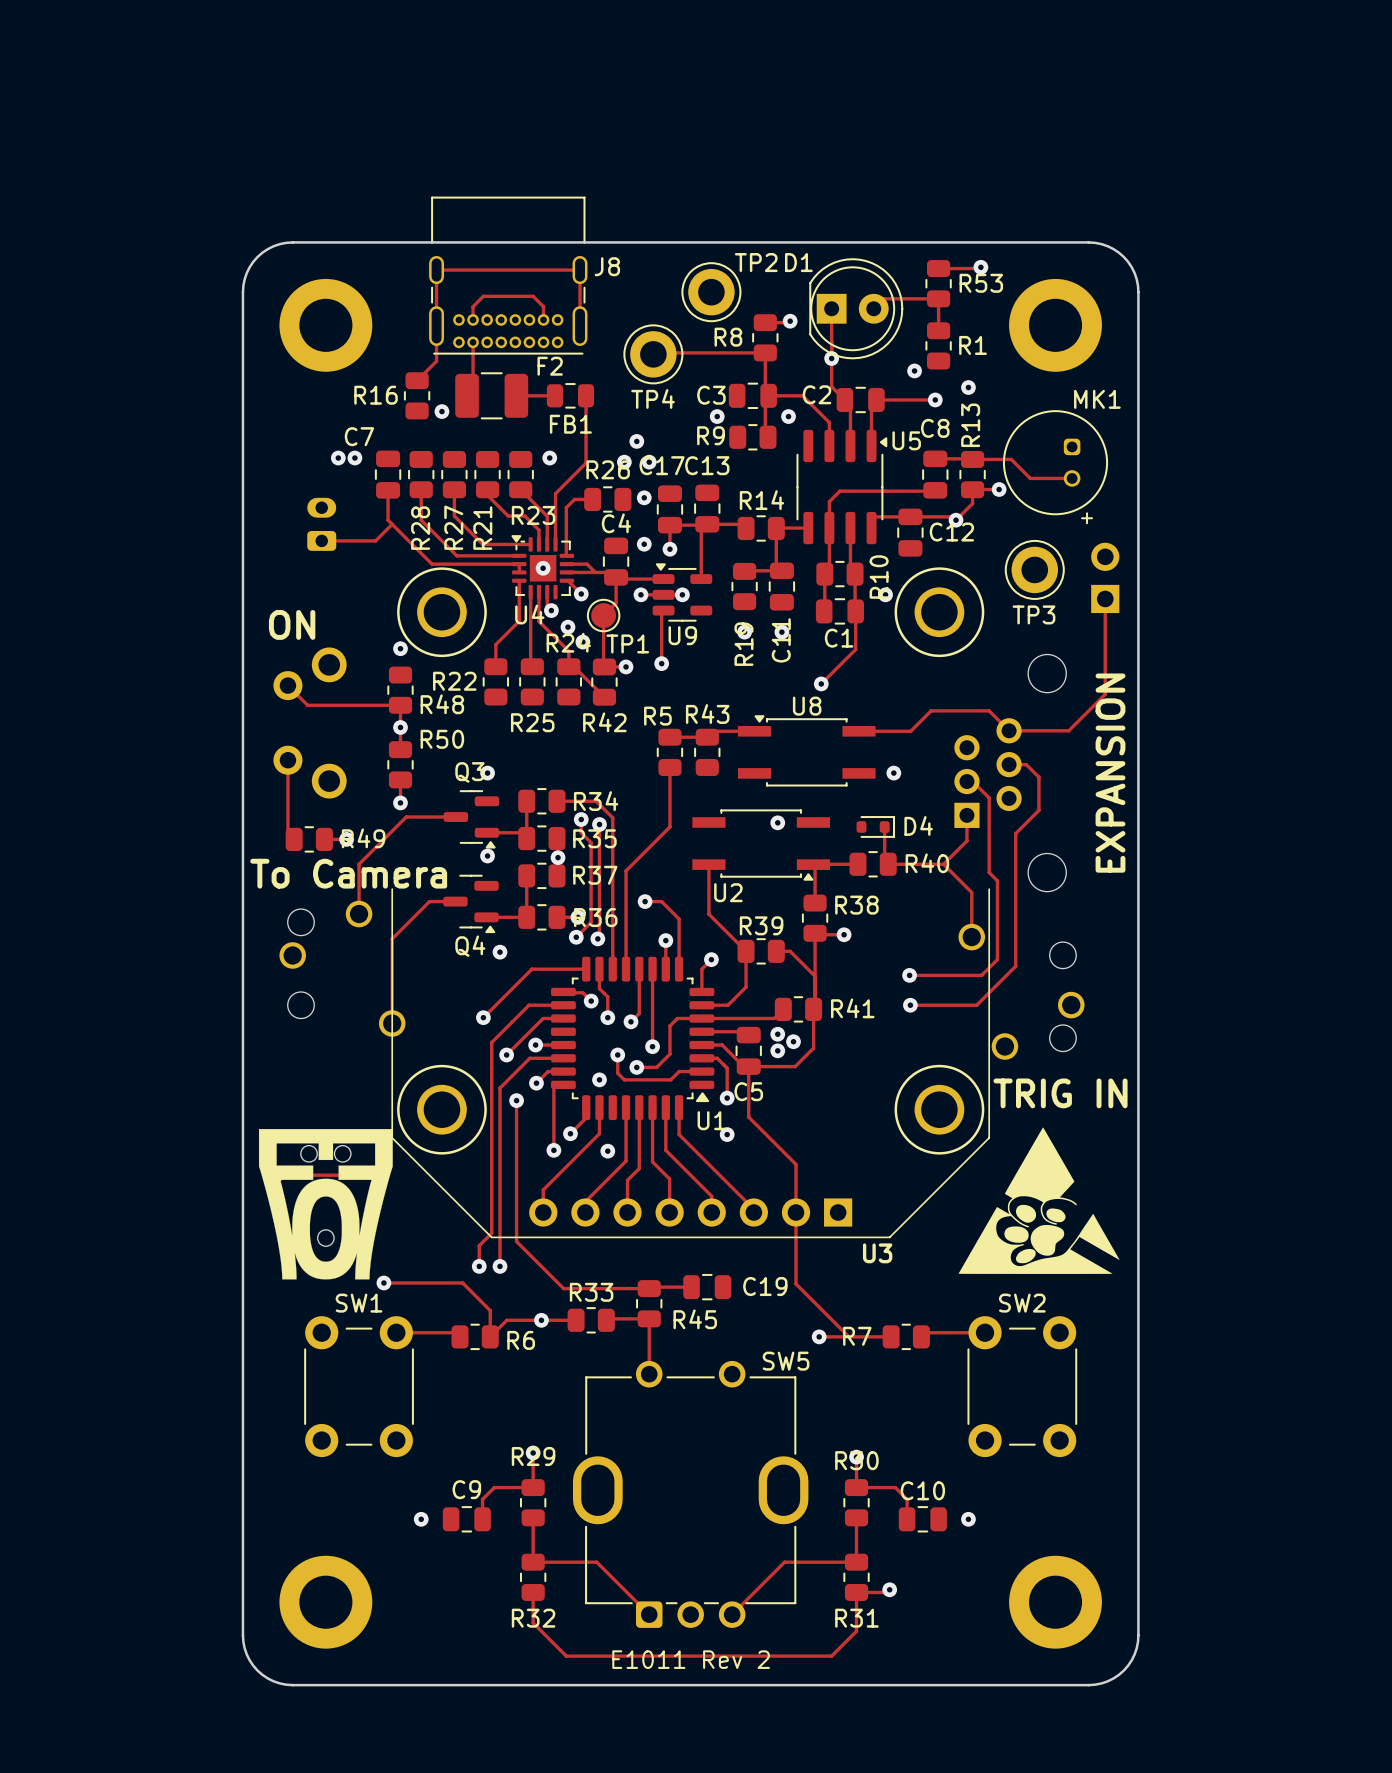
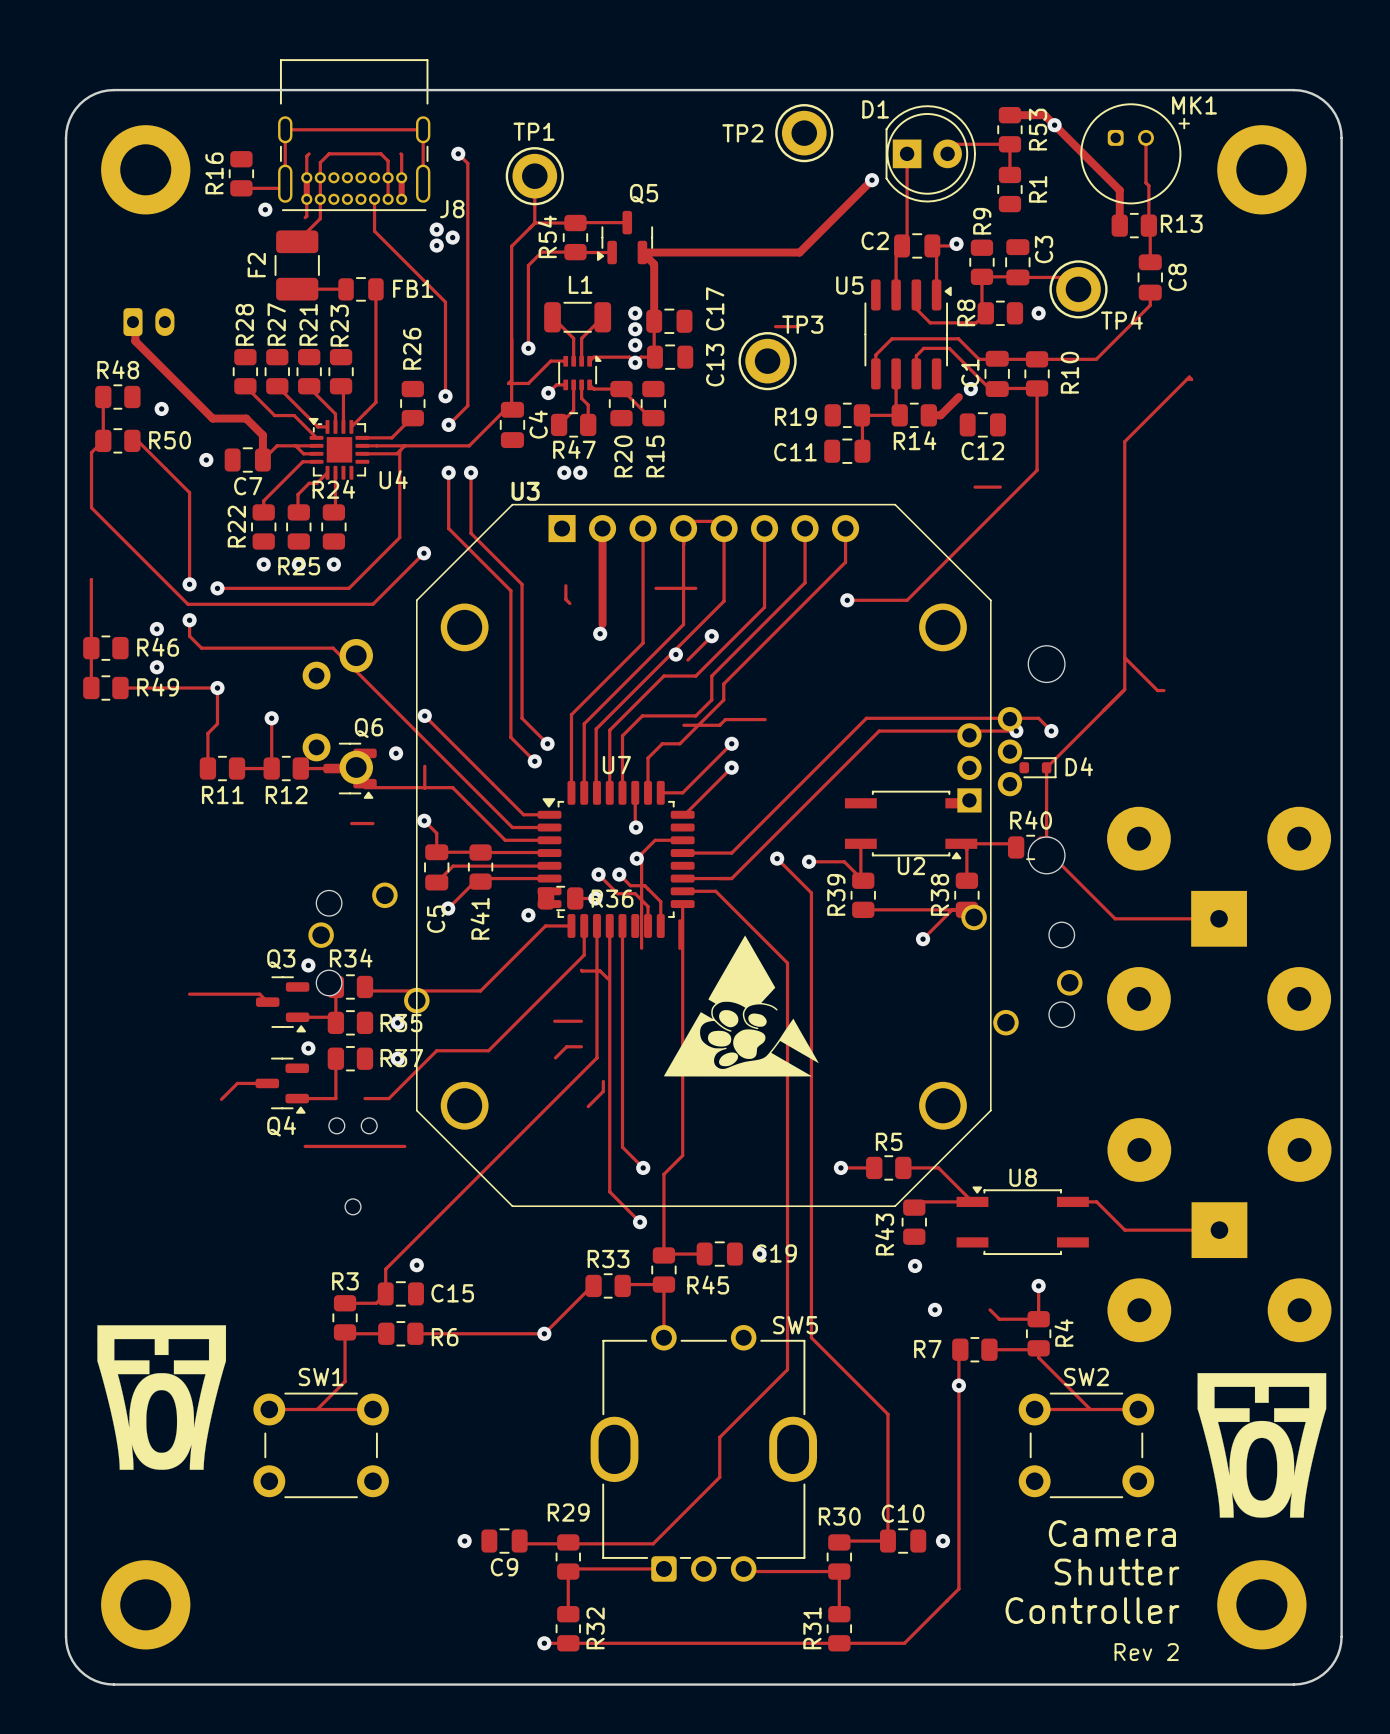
track: none -> (1009, 115) (1044, 115) (1119, 190) (1119, 225)
via: none -> (1054, 125)
track: none -> (1145, 137) (1145, 182) (1148, 185) (1150, 262)
track: none -> (309, 153) (306, 156) (306, 216) (305, 217)
track: none -> (400, 153) (401, 199)
track: none -> (458, 153) (467, 163) (467, 405) (448, 424)
via: none -> (458, 153)
track: none -> (907, 153) (907, 240) (896, 251) (896, 294)
track: none -> (534, 176) (534, 223)
track: none -> (872, 180) (799, 252) (642, 252) (654, 264) (654, 357) (640, 357) (635, 362) (629, 357) (593, 357) (589, 361)
via: none -> (872, 180)
track: none -> (423, 183) (423, 129) (285, 129) (285, 183) (280, 188) (241, 188)
track: none -> (374, 199) (374, 231) (445, 302) (445, 396)
track: none -> (388, 199) (388, 161) (380, 153) (329, 153) (320, 162) (320, 218) (297, 241)
via: none -> (265, 209)
track: none -> (627, 222) (534, 223) (511, 246) (511, 403) (469, 445) (362, 445)
via: none -> (436, 229)
via: none -> (452, 237)
R54: none -> (575, 237)
Q5: none -> (625, 237)
track: none -> (956, 243) (954, 245) (932, 245) (936, 250) (936, 294)
via: none -> (956, 243)
via: none -> (436, 245)
board edge: (292, 242) (1088, 242) (1101, 244) (1113, 249) (1123, 257) (1131, 267) (1136, 279) (1138, 292) (1138, 1635) (1136, 1648) (1131, 1660) (1123, 1670) (1113, 1678) (1101, 1683) (1088, 1685) (292, 1685) (279, 1683) (267, 1678) (257, 1670) (249, 1660) (244, 1648) (242, 1635) (242, 292) (246, 273) (257, 257) (273, 246) (292, 242) -> (113, 90) (95, 93) (80, 104) (69, 119) (66, 137) (66, 1636) (67, 1649) (75, 1665) (84, 1674) (95, 1680) (113, 1684) (1293, 1684) (1312, 1680) (1322, 1674) (1331, 1665) (1337, 1655) (1341, 1636) (1341, 137) (1337, 119) (1331, 108) (1322, 99) (1312, 93) (1293, 90) (113, 90)
track: none -> (612, 252) (541, 252) (528, 265) (528, 348)
TP2 footprint: [681, 262, 742, 323] -> [775, 104, 834, 163]
TP2 name position: TP2 (756, 262) -> TP2 (742, 133)
J8 name position: J8 (607, 266) -> J8 (452, 209)
track: (980, 267) (938, 268) -> none
via: (980, 267) -> none
J8 position: (508, 275) -> (354, 135)
track: none -> (297, 289) (345, 289)
track: none -> (375, 289) (375, 402) (351, 426)
R53 position: (938, 283) -> (1009, 129)
R53 name rotation: 0° (981, 283) -> 90° counterclockwise (1038, 129)
track: none -> (1078, 289) (1066, 277) (981, 276) (981, 309) (985, 313) (976, 322) (930, 322) (916, 309) (916, 294)
track: none -> (1150, 292) (1150, 305) (1096, 359) (979, 359) (958, 338) (891, 338) (875, 354) (875, 373)
via: none -> (635, 313)
track: (831, 308) (831, 386) (850, 405) (850, 445) -> none
D1 position: (856, 308) -> (930, 153)
track: (873, 308) (883, 298) (938, 298) (938, 330) -> (947, 153) (957, 144) (1009, 144) (1009, 174)
via: none -> (1038, 313)
track: none -> (552, 317) (573, 338) (573, 361)
L1: none -> (577, 317)
track: none -> (602, 317) (581, 338) (581, 361)
track: (473, 319) (473, 306) (483, 296) (533, 296) (543, 306) (543, 319) -> none
track: none -> (129, 325) (135, 320) (135, 341) (212, 418) (246, 418) (262, 435) (262, 459) (277, 445) (316, 445)
via: (790, 321) -> none
TP4 footprint: [623, 324, 684, 385] -> [1049, 260, 1108, 319]
part position: (325, 325) -> (145, 169)
via: none -> (635, 329)
part position: (1055, 325) -> (1261, 169)
track: (580, 326) (580, 270) (436, 270) (436, 361) (417, 380) -> none
R8 rotation: 0° (765, 337) -> 90° clockwise (1000, 313)
R8 position: (765, 337) -> (1000, 313)
via: none -> (635, 345)
track: (473, 342) (473, 389) (467, 395) -> none
via: none -> (528, 348)
R1 position: (938, 345) -> (1009, 189)
R1 name rotation: 0° (972, 345) -> 90° counterclockwise (1038, 189)
track: (653, 354) (765, 352) (765, 434) (768, 437) -> none
track: none -> (565, 361) (550, 361) (528, 383) (508, 383) (511, 380)
via: (831, 358) -> none
via: none -> (635, 362)
F2 name position: F2 (550, 366) -> F2 (256, 265)
part: none -> (579, 372)
via: (914, 370) -> none
track: none -> (896, 373) (896, 411) (899, 415) (861, 415) (862, 451)
track: none -> (916, 373) (916, 355) (923, 348) (949, 348) (990, 389) (1037, 388) (1037, 470) (907, 600) (847, 600)
track: none -> (1187, 379) (1191, 379) (1189, 377) (1124, 441) (1124, 689) (1046, 767) (1045, 848) (1115, 918) (1219, 918)
track: none -> (565, 384) (556, 384) (548, 393)
track: none -> (573, 384) (573, 410) (559, 424)
track: none -> (581, 384) (581, 398) (588, 404) (588, 424)
track: none -> (589, 384) (593, 389) (621, 389) (650, 418)
track: none -> (245, 386) (274, 415) (294, 415) (316, 437)
track: none -> (277, 386) (317, 426) (327, 426)
track: none -> (309, 386) (335, 413) (335, 426)
track: none -> (341, 386) (343, 388) (343, 426)
via: none -> (548, 393)
via: none -> (445, 396)
track: none -> (103, 397) (103, 440) (91, 452) (91, 507) (187, 604) (372, 604) (423, 553)
R16 name rotation: 0° (376, 395) -> 90° counterclockwise (214, 173)
R16 position: (417, 395) -> (241, 173)
F2 rotation: 0° (491, 395) -> 90° clockwise (297, 265)
F2 position: (491, 395) -> (297, 265)
track: (516, 395) (554, 395) -> none
FB1 position: (570, 395) -> (360, 289)
track: (586, 395) (586, 463) (555, 493) (555, 544) -> none
C3 name position: C3 (711, 395) -> C3 (1044, 249)
C3 rotation: 0° (752, 395) -> 90° clockwise (1017, 262)
C3 position: (752, 395) -> (1017, 262)
track: (768, 395) (802, 395) (829, 422) (829, 445) -> none
track: none -> (958, 397) (940, 415) (928, 415)
TP4 name position: TP4 (652, 398) -> TP4 (1121, 320)
C2 position: (860, 399) -> (917, 245)
track: (935, 399) (876, 399) (871, 404) (871, 445) -> none
via: (935, 399) -> none
R20: none -> (621, 403)
R15: none -> (653, 403)
via: none -> (161, 408)
via: (441, 411) -> none
via: (717, 416) -> none
via: (788, 416) -> none
track: none -> (410, 419) (391, 437) (362, 437)
via: none -> (448, 424)
R47: none -> (573, 424)
FB1 name position: FB1 (570, 424) -> FB1 (413, 288)
C8 name rotation: 0° (935, 428) -> 90° counterclockwise (1177, 277)
C8 name position: C8 (935, 428) -> C8 (1177, 277)
C7 name position: C7 (359, 436) -> C7 (248, 486)
R9 rotation: 0° (752, 437) -> 90° clockwise (981, 262)
R9 position: (752, 437) -> (981, 262)
U5 name position: U5 (906, 440) -> U5 (849, 285)
track: none -> (132, 440) (137, 440) (189, 492) (189, 584)
via: (636, 441) -> none
track: none -> (295, 445) (303, 453) (316, 453)
track: none -> (404, 445) (396, 453) (362, 453)
track: none -> (399, 450) (399, 537) (349, 588) (217, 588)
via: (338, 458) -> none
via: (354, 458) -> none
via: (549, 458) -> none
track: (935, 458) (1011, 459) (1030, 478) (1072, 478) -> none
via: none -> (206, 459)
via: (624, 462) -> none
via: (649, 462) -> none
track: none -> (316, 461) (302, 461) (263, 500) (263, 512)
MK1 rotation: 0° (1055, 467) -> 90° counterclockwise (1135, 153)
MK1 position: (1055, 467) -> (1135, 153)
track: none -> (327, 472) (316, 483) (309, 483) (298, 494) (298, 513)
track: none -> (335, 472) (335, 511) (333, 513)
C7 rotation: 0° (388, 474) -> 90° clockwise (247, 459)
C7 position: (388, 474) -> (247, 459)
R28 position: (421, 474) -> (245, 371)
track: none -> (448, 472) (448, 528) (510, 590) (510, 737) (534, 761)
via: none -> (448, 472)
track: none -> (471, 472) (471, 533) (522, 584) (522, 718) (547, 743)
via: none -> (471, 472)
R27 position: (454, 474) -> (277, 371)
R21 position: (487, 474) -> (309, 371)
R23 position: (520, 474) -> (341, 371)
via: none -> (564, 472)
via: none -> (580, 472)
C8 position: (935, 474) -> (1150, 277)
R13 rotation: 0° (972, 474) -> 90° clockwise (1134, 225)
R13 position: (972, 474) -> (1134, 225)
U5 position: (841, 487) -> (908, 334)
track: (454, 489) (454, 516) (482, 544) (530, 544) -> none
track: (487, 489) (487, 495) (508, 516) (524, 516) (538, 530) (538, 544) -> none
track: (972, 489) (972, 503) (959, 516) (873, 516) -> none
via: (999, 489) -> none
track: (388, 490) (388, 520) (432, 564) (519, 564) (519, 572) -> none
track: (935, 490) (839, 491) (829, 501) (829, 569) (824, 574) (824, 611) -> none
track: (421, 491) (421, 520) (456, 555) (519, 555) -> none
track: (520, 491) (547, 516) (547, 544) -> none
via: (644, 497) -> none
track: (592, 499) (574, 499) (566, 507) (566, 555) -> none
R26 rotation: 0° (607, 499) -> 90° clockwise (412, 403)
R26 position: (607, 499) -> (412, 403)
R14 name position: R14 (761, 500) -> R14 (915, 440)
C13 rotation: 0° (707, 508) -> 90° clockwise (670, 357)
C13 position: (707, 508) -> (670, 357)
C17 rotation: 0° (669, 509) -> 90° clockwise (669, 321)
C17 position: (669, 509) -> (669, 321)
R23 name rotation: 0° (533, 515) -> 90° counterclockwise (339, 325)
R23 name position: R23 (533, 515) -> R23 (339, 325)
via: (956, 520) -> none
C4 name rotation: 0° (616, 523) -> 90° counterclockwise (538, 424)
C4 name position: C4 (616, 523) -> C4 (538, 424)
part rotation: 0° (321, 524) -> 90° clockwise (148, 322)
part position: (321, 524) -> (148, 322)
track: (392, 524) (375, 540) (321, 540) -> none
R27 name position: R27 (453, 527) -> R27 (276, 324)
R28 name position: R28 (420, 528) -> R28 (244, 324)
R21 name position: R21 (482, 528) -> R21 (308, 324)
track: (746, 528) (741, 524) (707, 524) (701, 530) (701, 579) -> none
R14 position: (761, 528) -> (914, 415)
track: (808, 528) (776, 528) (776, 565) (781, 570) (744, 571) -> none
track: (850, 528) (850, 569) (855, 574) (855, 649) (821, 683) -> none
track: none -> (602, 528) (602, 629)
track: none -> (643, 528) (643, 643) (571, 714) (571, 792)
track: none -> (683, 528) (683, 624) (584, 723) (584, 792)
track: none -> (724, 528) (724, 601) (596, 729) (596, 792)
track: none -> (764, 528) (764, 607) (695, 676) (663, 676) (609, 730) (609, 792)
track: none -> (805, 528) (805, 582) (711, 676) (711, 699) (695, 715) (642, 715) (622, 735) (622, 792)
track: none -> (845, 528) (845, 562) (723, 684) (723, 699) (679, 743) (662, 743) (648, 758) (648, 792)
C12 rotation: 0° (910, 532) -> 90° clockwise (982, 424)
C12 position: (910, 532) -> (982, 424)
TP3 footprint: [1004, 539, 1065, 600] -> [738, 332, 797, 391]
via: (644, 544) -> none
via: (669, 549) -> none
via: none -> (423, 553)
C4 position: (616, 561) -> (512, 424)
track: (566, 564) (587, 564) (595, 572) -> none
drawing: [397, 567, 487, 658] -> none
U4 position: (542, 567) -> (339, 448)
drawing: [894, 567, 985, 658] -> none
via: (543, 568) -> none
via: none -> (263, 564)
via: none -> (298, 564)
via: none -> (333, 564)
track: (566, 572) (611, 572) (617, 579) (663, 579) -> none
R10 rotation: 0° (839, 574) -> 90° clockwise (1037, 373)
R10 position: (839, 574) -> (1037, 373)
track: (616, 577) (616, 603) (603, 615) (603, 666) (626, 666) -> none
part: (1105, 577) -> none
track: (519, 580) (519, 621) (495, 644) (495, 666) -> none
track: (566, 580) (581, 593) -> none
track: none -> (91, 579) (91, 688)
R19 rotation: 0° (744, 586) -> 90° clockwise (847, 415)
R19 position: (744, 586) -> (847, 415)
C11 rotation: 0° (781, 586) -> 90° clockwise (847, 451)
C11 position: (781, 586) -> (847, 451)
U3 footprint: [391, 587, 991, 1239] -> [416, 503, 992, 1208]
via: none -> (189, 584)
track: (530, 592) (530, 665) (532, 666) -> none
track: (538, 592) (538, 621) (568, 651) (568, 666) (573, 666) (604, 697) -> none
U9: (682, 592) -> none
via: (581, 593) -> none
via: none -> (217, 588)
via: (640, 594) -> none
via: (682, 594) -> none
via: (885, 594) -> none
TP1 footprint: [586, 598, 621, 633] -> [505, 147, 564, 206]
track: (1105, 598) (1105, 694) (1068, 730) (1009, 730) (989, 710) (931, 710) (910, 731) (859, 731) -> none
via: none -> (847, 600)
via: (551, 610) -> none
track: (663, 610) (661, 612) (661, 663) -> none
C1 rotation: 0° (839, 611) -> 90° clockwise (997, 373)
C1 position: (839, 611) -> (997, 373)
U4 name position: U4 (529, 614) -> U4 (393, 479)
TP3 name position: TP3 (1033, 614) -> TP3 (802, 324)
text: ON (292, 624) -> none
track: none -> (189, 620) (189, 636) (201, 648) (333, 648) (512, 827) (549, 827)
via: none -> (189, 620)
via: (567, 627) -> none
via: (744, 632) -> none
via: (781, 632) -> none
via: none -> (156, 629)
TP1 name position: TP1 (627, 643) -> TP1 (534, 131)
track: none -> (711, 636) (687, 660)
via: none -> (711, 636)
via: (400, 648) -> none
R46: none -> (105, 648)
via: (626, 666) -> none
track: none -> (1124, 657) (1157, 690) (1163, 690)
via: none -> (156, 667)
R22 name rotation: 0° (454, 681) -> 90° counterclockwise (236, 526)
R22 position: (495, 681) -> (263, 526)
R25 position: (532, 681) -> (298, 526)
R24 position: (568, 681) -> (333, 526)
R42: (604, 682) -> none
via: (821, 683) -> none
track: (287, 685) (307, 705) (400, 705) (400, 749) -> none
R48 rotation: 0° (400, 690) -> 90° clockwise (117, 397)
R48 position: (400, 690) -> (117, 397)
track: none -> (120, 688) (217, 688) (217, 723) (207, 733) (207, 768)
via: none -> (217, 688)
R48 name position: R48 (442, 704) -> R48 (118, 369)
R43 name rotation: 0° (707, 714) -> 90° counterclockwise (884, 1234)
R43 name position: R43 (707, 714) -> R43 (884, 1234)
track: none -> (424, 715) (523, 814) (549, 814)
track: none -> (271, 718) (271, 768) (237, 768)
via: none -> (271, 718)
track: none -> (1016, 731) (879, 731) (731, 878) (682, 878)
via: none -> (1016, 731)
track: none -> (1051, 731) (1038, 718) (866, 718) (731, 853) (682, 853)
via: none -> (1051, 731)
U8 position: (806, 750) -> (1022, 1220)
R5 rotation: 0° (669, 752) -> 90° clockwise (888, 1167)
R5 position: (669, 752) -> (888, 1167)
R43 position: (707, 752) -> (914, 1222)
via: none -> (547, 743)
track: none -> (731, 743) (682, 792) (660, 792)
via: none -> (731, 743)
track: (287, 760) (287, 833) (294, 839) -> none
R50 rotation: 0° (400, 764) -> 90° clockwise (117, 440)
R50 position: (400, 764) -> (117, 440)
track: (1009, 764) (1026, 764) (1038, 777) (1038, 810) (1015, 833) (1015, 966) (976, 1005) (910, 1005) -> none
via: none -> (396, 753)
track: (669, 767) (669, 826) (640, 856) -> (682, 840) (655, 840)
via: (487, 773) -> none
via: (893, 773) -> none
text: EXPANSION (1110, 773) -> none
via: none -> (534, 761)
track: none -> (731, 767) (682, 814)
via: none -> (731, 767)
track: (966, 781) (972, 781) (989, 797) (989, 872) (997, 880) (997, 959) (981, 975) (909, 975) -> none
R11: none -> (222, 768)
R12: none -> (286, 768)
track: none -> (300, 768) (335, 768)
Q6: none -> (350, 770)
track: (526, 801) (526, 838) (520, 832) (486, 832) -> (335, 986) (335, 1022) (330, 1017) (297, 1017)
R34 position: (541, 801) -> (350, 986)
track: (557, 801) (596, 801) (612, 817) (612, 969) -> none
R34 name position: R34 (596, 801) -> R34 (351, 958)
track: none -> (364, 787) (452, 787) (505, 840) (549, 840)
via: (400, 802) -> none
track: none -> (635, 792) (636, 827)
track: (966, 815) (966, 840) (943, 864) -> none
track: (455, 817) (406, 817) (359, 864) (359, 914) -> none
Q3 position: (471, 819) -> (282, 1004)
track: (581, 819) (581, 832) (591, 842) (591, 922) (576, 937) -> none
via: (581, 819) -> none
via: (777, 822) -> none
track: (599, 824) (599, 937) (597, 938) -> none
via: (599, 824) -> none
D4 position: (875, 826) -> (1038, 767)
track: (884, 826) (884, 860) (888, 864) (943, 864) -> none
track: none -> (424, 820) (436, 833) (436, 852) (549, 853)
via: none -> (424, 820)
R35 position: (541, 838) -> (350, 1022)
R49 position: (309, 839) -> (105, 688)
via: (346, 839) -> none
via: none -> (636, 827)
U2 position: (761, 845) -> (911, 824)
via: (487, 855) -> none
via: (558, 857) -> none
track: none -> (860, 843) (860, 878)
R40 name position: R40 (927, 863) -> R40 (1031, 820)
track: (708, 864) (708, 914) (746, 951) (746, 987) (728, 1005) (701, 1005) -> none
track: (857, 864) (813, 864) (815, 903) -> none
R40 position: (873, 864) -> (1030, 847)
track: (943, 864) (971, 892) (971, 937) -> none
track: none -> (1016, 847) (1012, 843) (961, 843) (966, 849) (966, 880)
text: To Camera (348, 873) -> none
track: (526, 875) (526, 917) (486, 917) -> (335, 1058) (335, 1098) (297, 1098)
R37 position: (541, 875) -> (350, 1058)
via: none -> (636, 858)
track: none -> (777, 858) (811, 892) (811, 1337) (887, 1414) (887, 1541) (839, 1542)
via: none -> (777, 858)
U7: none -> (616, 859)
track: none -> (809, 861) (844, 861) (863, 880)
via: none -> (809, 861)
track: none -> (549, 865) (453, 866) (436, 882)
track: none -> (598, 874) (617, 893) (635, 893) (648, 906) (648, 925)
via: none -> (598, 874)
track: none -> (619, 874) (630, 885) (644, 885) (660, 901) (660, 925)
via: none -> (619, 874)
U2 name position: U2 (728, 892) -> U2 (911, 865)
track: none -> (549, 878) (483, 878) (480, 881) (475, 881) (448, 908)
track: (455, 901) (429, 901) (392, 938) (392, 1023) -> none
track: (645, 901) (661, 901) (679, 919) (679, 969) -> none
via: (645, 901) -> none
Q4 position: (470, 903) -> (282, 1085)
R38 name rotation: 0° (856, 905) -> 90° counterclockwise (939, 894)
R38 name position: R38 (856, 905) -> R38 (939, 894)
track: none -> (682, 891) (715, 891) (787, 963) (787, 1369) (719, 1437) (719, 1477) (653, 1543) (522, 1543) (519, 1541)
R38 position: (815, 918) -> (966, 895)
R39 name position: R39 (761, 925) -> R39 (836, 894)
via: none -> (448, 908)
track: none -> (863, 909) (966, 909)
track: none -> (952, 909) (923, 939)
track: (844, 934) (815, 933) (813, 1048) (795, 1066) (743, 1066) (722, 1045) (701, 1045) -> none
via: (844, 934) -> none
via: (576, 937) -> none
via: (597, 938) -> none
part: none -> (1219, 918)
via: (665, 940) -> none
track: none -> (571, 925) (545, 925) (480, 990) (368, 990) (364, 986)
track: none -> (584, 925) (584, 955) (488, 1050) (436, 1050) (388, 1098) (364, 1098)
track: none -> (596, 925) (596, 1057) (385, 1269) (385, 1293) (376, 1303) (345, 1303)
track: none -> (609, 925) (609, 1191) (640, 1222)
track: none -> (622, 925) (622, 1147) (643, 1167)
R39 rotation: 0° (761, 951) -> 90° clockwise (863, 895)
R39 position: (761, 951) -> (863, 895)
track: (776, 951) (790, 951) (815, 976) -> none
via position: (499, 952) -> (528, 915)
track: (711, 959) (701, 969) (701, 991) -> none
via: (711, 959) -> none
track: (586, 969) (531, 969) (483, 1017) -> none
track: (599, 969) (599, 988) (607, 996) (607, 1017) -> none
track: (639, 969) (639, 1013) (631, 1021) -> none
track: (652, 969) (652, 1046) -> none
via position: (909, 975) -> (923, 939)
via: none -> (308, 965)
via: (591, 1001) -> none
track: (563, 1005) (529, 1005) (491, 1042) (491, 1233) (479, 1245) (479, 1266) -> none
via: (910, 1005) -> none
track: (783, 1009) (774, 1018) (677, 1018) (669, 1025) (669, 1054) (656, 1067) (636, 1067) -> none
R41 rotation: 0° (798, 1009) -> 90° clockwise (480, 867)
R41 position: (798, 1009) -> (480, 867)
track: none -> (189, 994) (259, 994) (267, 1002)
via: (483, 1017) -> none
via: (607, 1017) -> none
track: (563, 1018) (543, 1018) (506, 1054) -> none
via: (631, 1021) -> none
track: (701, 1031) (745, 1031) (748, 1035) -> none
via: (777, 1034) -> none
U1: (632, 1038) -> none
via: (793, 1041) -> none
via: (535, 1045) -> none
via: none -> (397, 1022)
via: (652, 1046) -> none
C5 position: (748, 1050) -> (436, 867)
via: (777, 1050) -> none
via: (506, 1054) -> none
track: (617, 1054) (617, 1073) (624, 1079) (670, 1079) (679, 1071) (701, 1071) -> none
via: (617, 1054) -> none
track: (563, 1058) (529, 1058) (499, 1088) (499, 1266) -> none
track: (701, 1058) (717, 1058) (727, 1068) (727, 1098) -> none
drawing: [397, 1064, 487, 1155] -> none
drawing: [894, 1064, 985, 1155] -> none
track: (748, 1066) (748, 1117) (795, 1164) (795, 1283) (848, 1336) -> none
via: (636, 1067) -> none
via: none -> (308, 1048)
via: (599, 1079) -> none
via: (536, 1083) -> none
via: none -> (397, 1058)
track: (553, 1084) (553, 1150) -> none
C5 name rotation: 0° (748, 1091) -> 90° counterclockwise (436, 919)
text: TRIG IN (1060, 1093) -> none
via: (727, 1098) -> none
track: (516, 1100) (516, 1241) (563, 1288) (649, 1288) -> (682, 904) (682, 1155) (663, 1174) (663, 1255)
via: (516, 1100) -> none
track: (599, 1107) (599, 1133) (543, 1189) (543, 1212) -> none
track: (626, 1107) (626, 1161) (585, 1201) (585, 1212) -> none
track: (639, 1107) (639, 1168) (627, 1180) (627, 1212) -> none
track: (652, 1107) (652, 1161) (669, 1179) (669, 1212) -> none
track: (665, 1107) (665, 1150) (711, 1196) (711, 1212) -> none
track: (679, 1107) (679, 1134) (753, 1209) (753, 1212) -> none
track: none -> (267, 1083) (237, 1083) (221, 1099)
via: (570, 1133) -> none
via: (727, 1134) -> none
via: (553, 1150) -> none
via: (607, 1151) -> none
via: none -> (643, 1167)
via: none -> (840, 1167)
track: none -> (874, 1167) (840, 1167) (839, 1169)
track: none -> (903, 1167) (938, 1167) (972, 1201) (919, 1201) (914, 1207)
drawing position: (1039, 1200) -> (741, 1006)
drawing position: (325, 1204) -> (161, 1397)
drawing position: (1026, 1213) -> (728, 1018)
drawing position: (1055, 1215) -> (757, 1020)
track: none -> (1072, 1201) (1096, 1201) (1124, 1230) (1219, 1230)
drawing position: (1016, 1234) -> (719, 1038)
drawing position: (1047, 1240) -> (749, 1044)
via: none -> (640, 1222)
U3 name position: U3 (877, 1253) -> U3 (525, 491)
drawing position: (1025, 1256) -> (728, 1059)
part: none -> (1219, 1230)
via: (479, 1266) -> none
via: (499, 1266) -> none
track: (383, 1282) (462, 1282) (490, 1310) (490, 1336) (506, 1320) (574, 1320) -> (415, 1333) (544, 1333) (592, 1285)
via position: (383, 1282) -> (416, 1265)
via: none -> (759, 1254)
via: none -> (915, 1266)
via: (541, 1320) -> none
track: none -> (1038, 1285) (1038, 1319) (999, 1319) (990, 1309)
via: none -> (1038, 1285)
C15: none -> (400, 1293)
track: (396, 1332) (455, 1332) (459, 1336) -> none
track: (985, 1332) (925, 1332) (921, 1336) -> none
R6 position: (475, 1336) -> (400, 1333)
track: (819, 1336) (891, 1336) -> none
via: (819, 1336) -> none
R7 position: (906, 1336) -> (974, 1349)
via: none -> (935, 1309)
R3: none -> (345, 1317)
track: none -> (386, 1333) (345, 1332) (345, 1381) (317, 1409)
via: none -> (544, 1333)
R4: none -> (1038, 1333)
SW1 rotation: 0° (359, 1386) -> 90° clockwise (321, 1445)
SW1 position: (359, 1386) -> (321, 1445)
track: none -> (960, 1349) (958, 1588) (904, 1643) (544, 1643)
track: none -> (989, 1349) (1038, 1348) (1038, 1357) (1090, 1409)
SW2 rotation: 0° (1022, 1386) -> 90° clockwise (1086, 1445)
SW2 position: (1022, 1386) -> (1086, 1445)
drawing: none -> [1197, 1373, 1327, 1518]
via: none -> (958, 1385)
track: none -> (265, 1409) (368, 1409)
track: none -> (1034, 1409) (1138, 1409)
track: (533, 1452) (533, 1487) (494, 1487) (482, 1499) (482, 1519) -> none
via: (533, 1452) -> none
track: (856, 1457) (856, 1487) (895, 1487) (907, 1499) (907, 1519) -> none
via: (856, 1457) -> none
C9 name position: C9 (466, 1489) -> C9 (504, 1567)
R29 position: (533, 1502) -> (568, 1556)
R30 position: (856, 1502) -> (839, 1556)
track: (533, 1517) (533, 1562) (596, 1562) (649, 1614) -> (568, 1614) (568, 1572) (572, 1568) (663, 1568)
track: (856, 1517) (856, 1562) (784, 1562) (732, 1614) -> (839, 1614) (839, 1571) (746, 1571) (743, 1568)
via position: (421, 1519) -> (464, 1541)
C9 position: (466, 1519) -> (504, 1541)
C10 position: (922, 1519) -> (903, 1541)
via: (968, 1519) -> none
R32 position: (533, 1577) -> (568, 1628)
R31 position: (856, 1577) -> (839, 1628)
text: none -> Camera (1112, 1533)
via: none -> (942, 1541)
track: (889, 1589) (886, 1592) (856, 1592) (856, 1631) (831, 1656) (566, 1656) (533, 1622) (533, 1592) -> none
via: (889, 1589) -> none
part position: (325, 1602) -> (145, 1604)
part position: (1055, 1602) -> (1261, 1604)
text: none -> Shutter (1116, 1572)
R32 name rotation: 0° (533, 1618) -> 90° counterclockwise (595, 1628)
R31 name rotation: 0° (856, 1618) -> 90° counterclockwise (812, 1628)
text: none -> Controller (1092, 1610)
text: E1011 Rev 2 (691, 1659) -> none
via: none -> (544, 1643)
text: none -> Rev 2 (1146, 1652)

